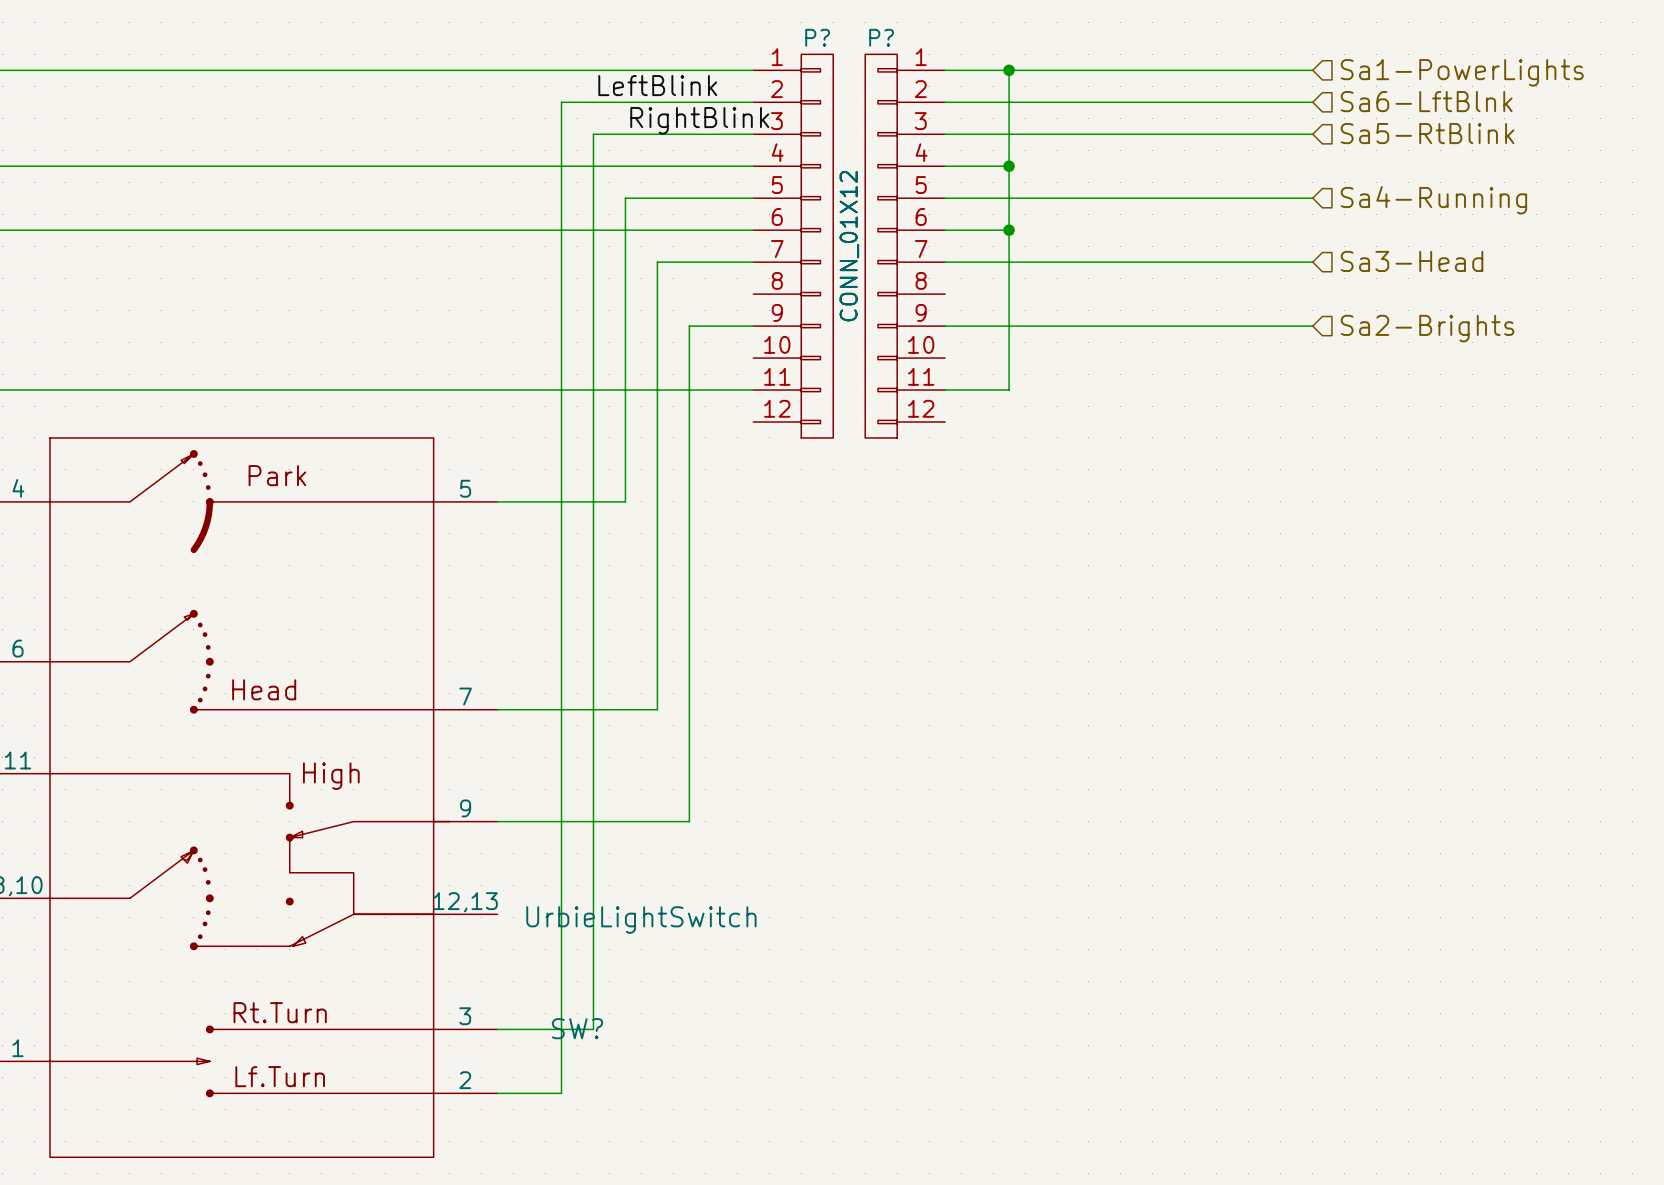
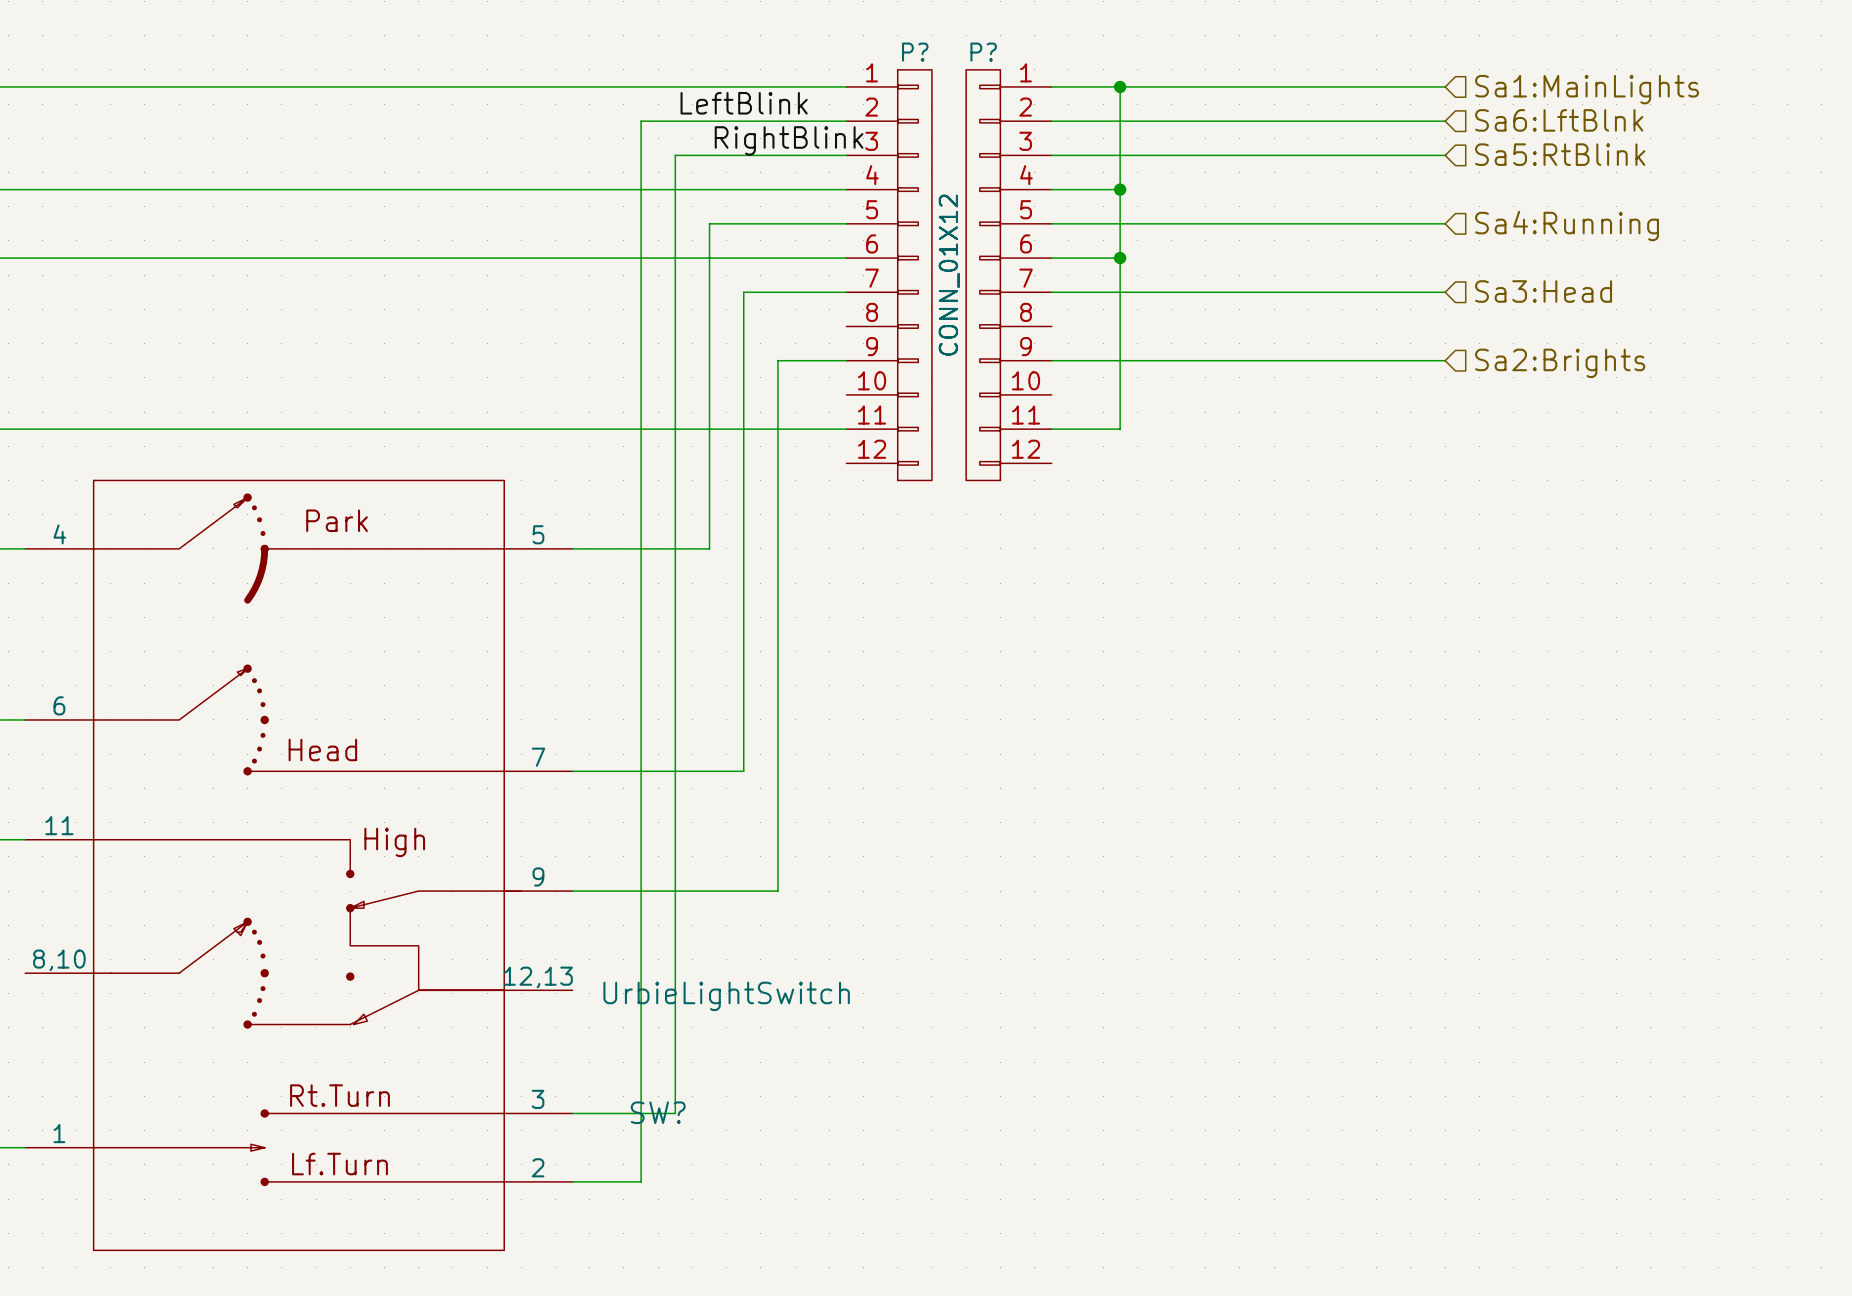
hierarchical label: Sa1-PowerLights (1462, 72) -> Sa1:MainLights (1587, 89)
hierarchical label: Sa6-LftBlnk (1426, 101) -> Sa6:LftBlnk (1559, 120)
hierarchical label: Sa5-RtBlink (1427, 133) -> Sa5:RtBlink (1560, 154)
hierarchical label: Sa4-Running (1433, 200) -> Sa4:Running (1567, 226)
hierarchical label: Sa3-Head (1412, 261) -> Sa3:Head (1543, 291)
hierarchical label: Sa2-Brights (1427, 328) -> Sa2:Brights (1560, 363)

